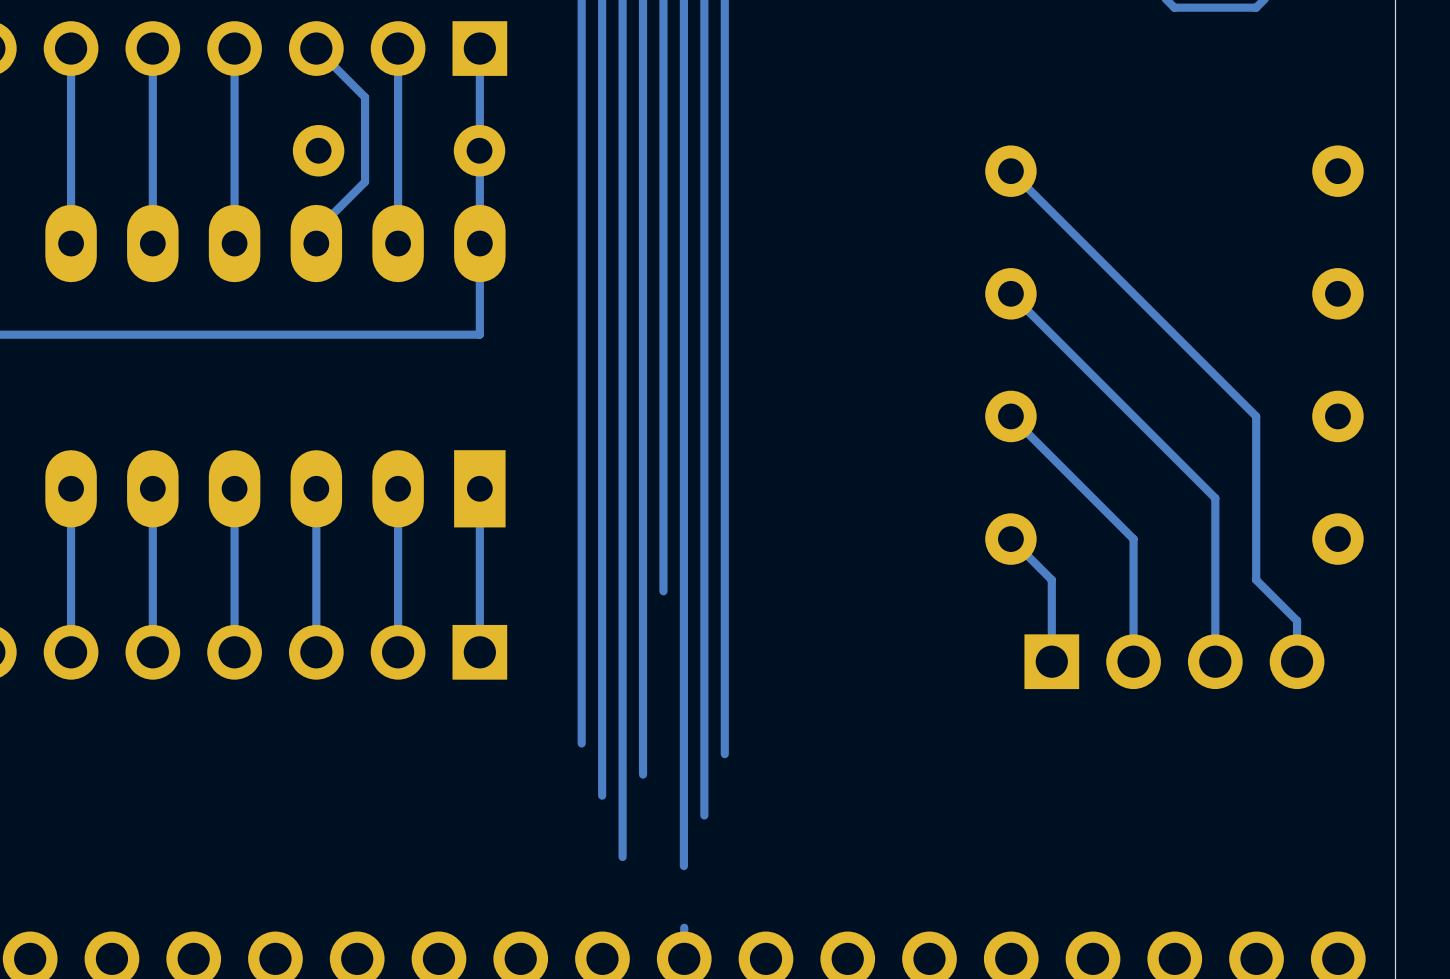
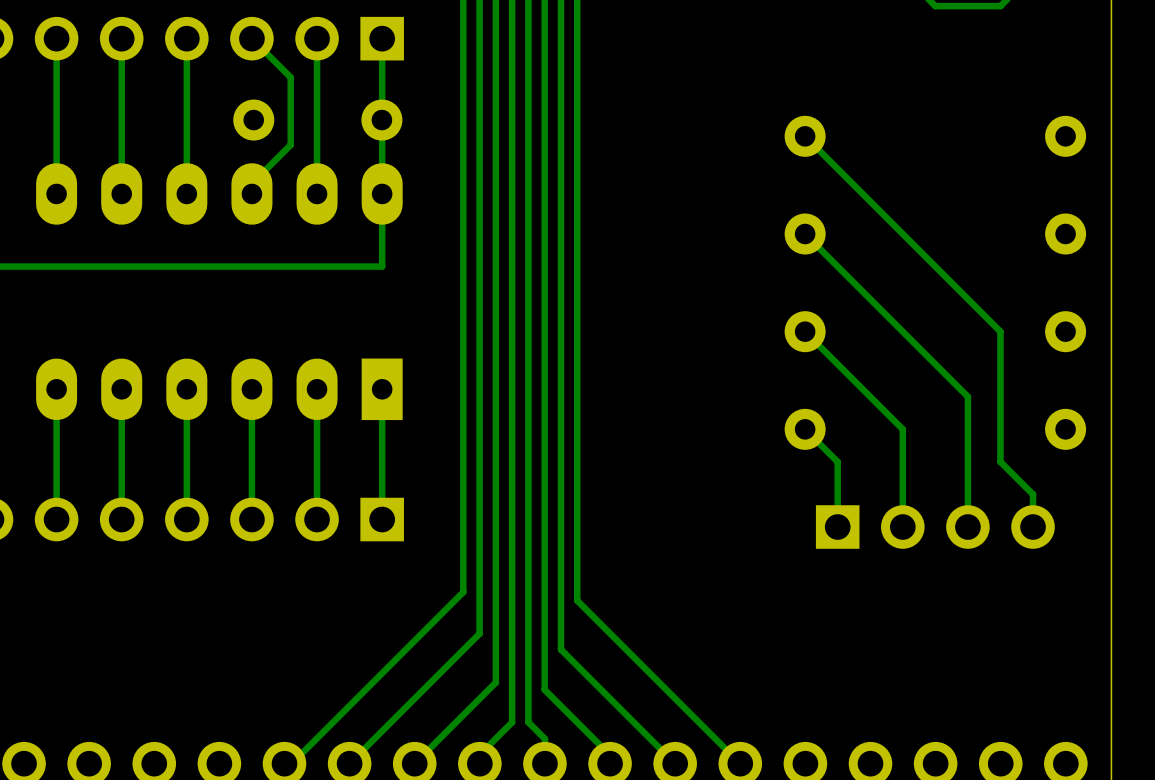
bottom track: none -> (528, 470) (528, 722) (544, 738)
bottom track: none -> (463, 592) (291, 763)
bottom track: none -> (577, 600) (740, 763)
bottom track: none -> (512, 616) (512, 722) (479, 754)
bottom track: none -> (479, 633) (349, 763)
bottom track: none -> (560, 649) (675, 763)
bottom track: none -> (495, 682) (414, 763)
bottom track: none -> (544, 689) (609, 754)

